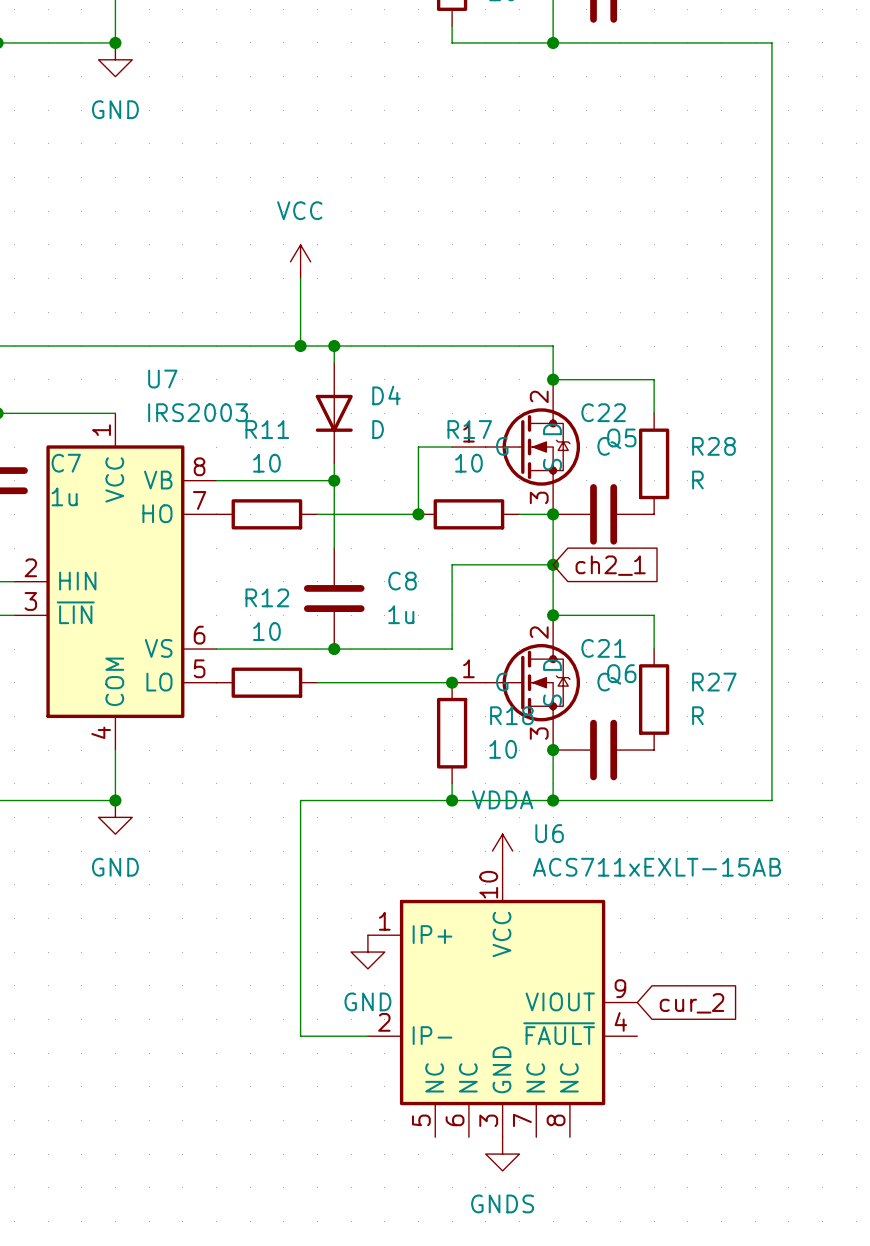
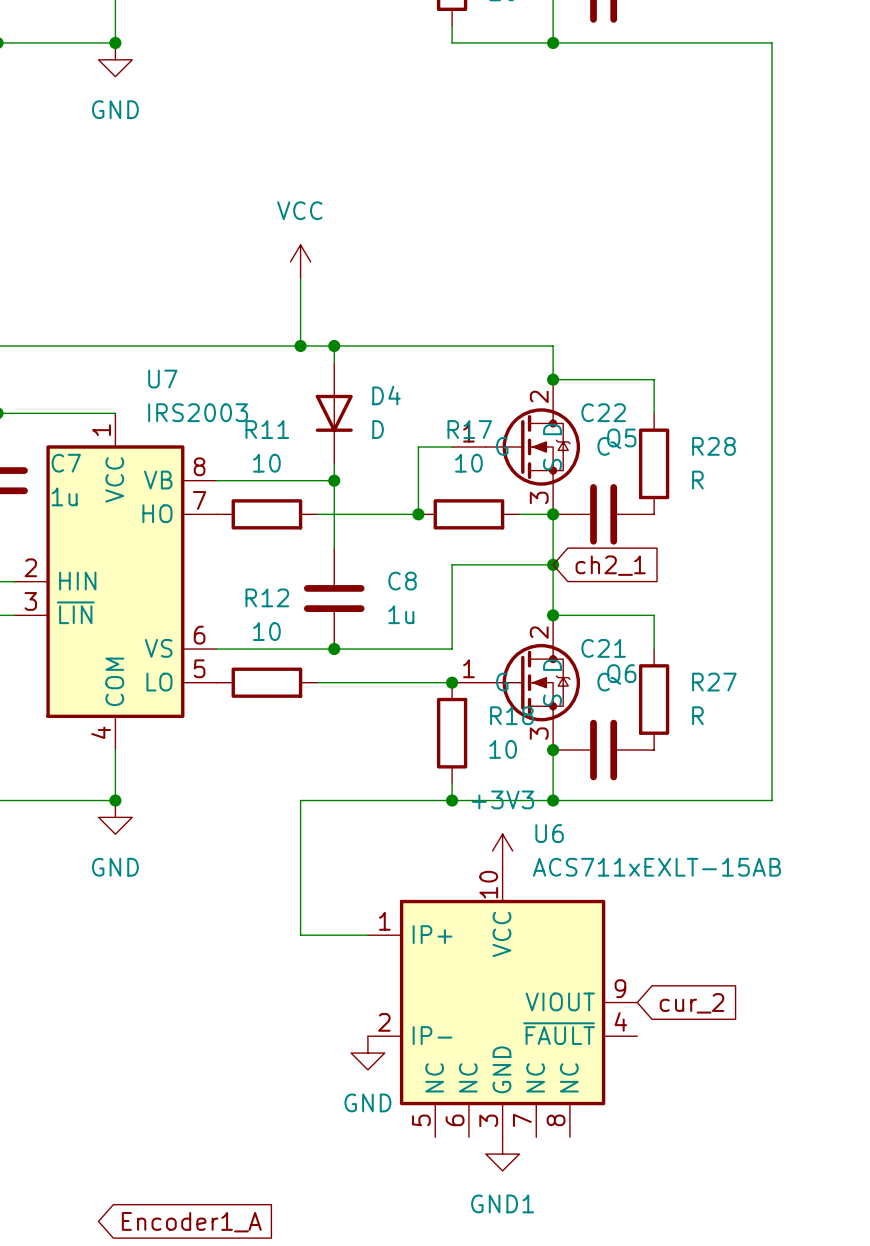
power symbol: VDDA (502, 851) -> +3V3 (502, 851)
wire: (300, 935) (300, 1036) (367, 1036) -> (300, 935) (367, 935)
power symbol position: GND (367, 952) -> GND (367, 1053)
power symbol: GNDS (502, 1154) -> GND1 (502, 1154)
global label: none -> Encoder1_A (191, 1222)

